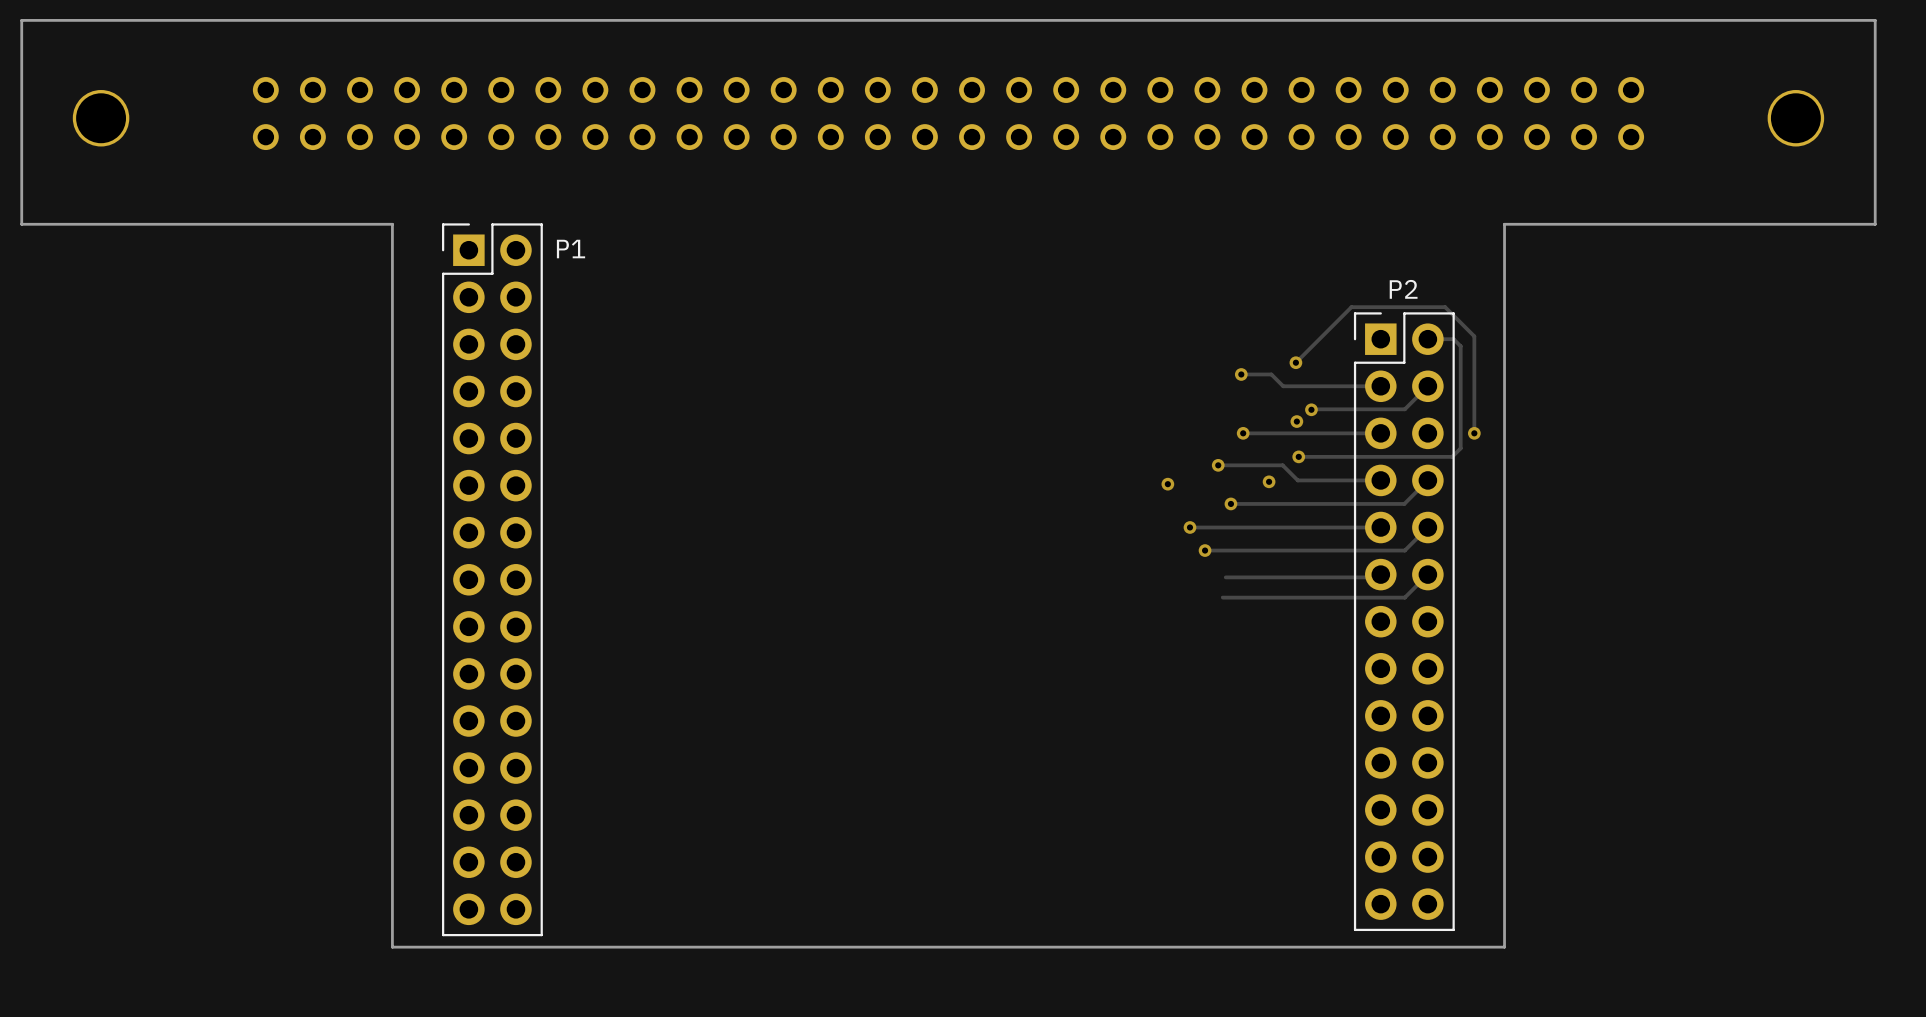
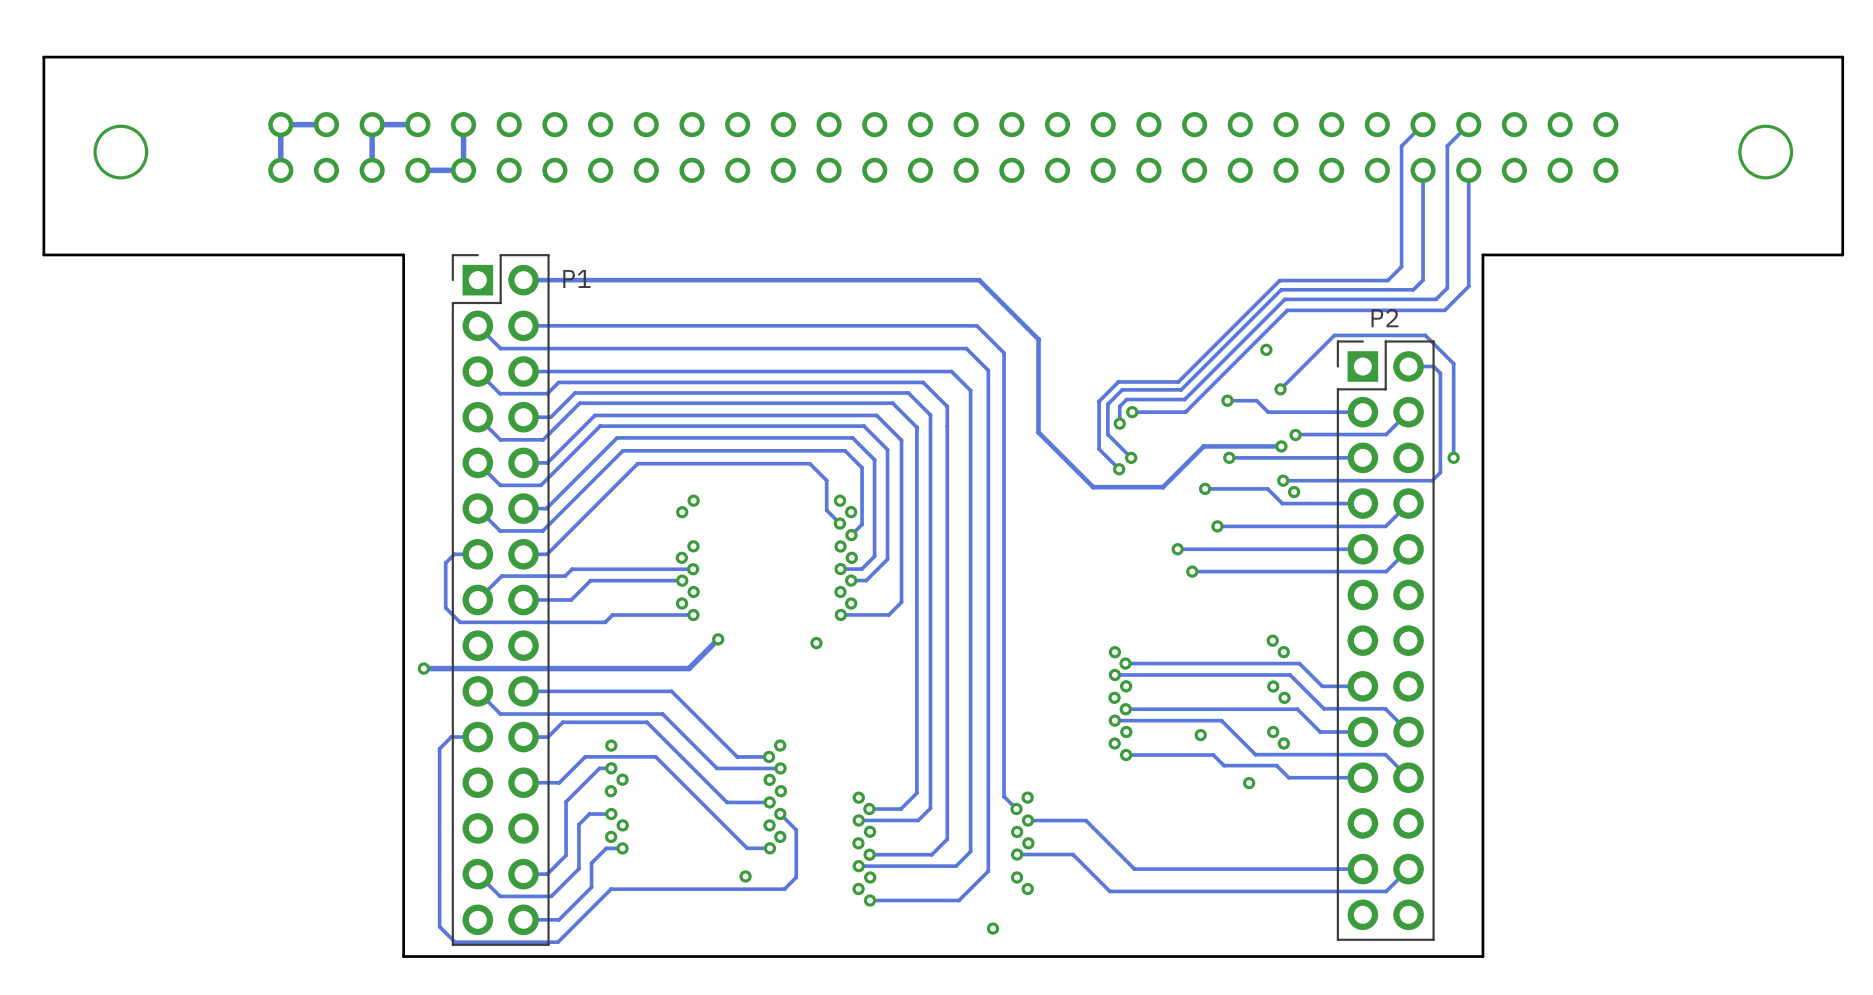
track: none -> (326, 124) (280, 124) (280, 170)
track: none -> (417, 124) (372, 124) (372, 170)
track: none -> (463, 124) (463, 170) (417, 170)
track: none -> (1423, 124) (1401, 146) (1401, 266) (1387, 280) (1279, 280) (1178, 382) (1118, 382) (1099, 401) (1099, 449) (1119, 469)
track: none -> (1468, 124) (1447, 146) (1447, 288) (1436, 299) (1284, 299) (1184, 399) (1126, 399) (1119, 406) (1119, 423)
track: none -> (1423, 170) (1423, 280) (1413, 289) (1281, 289) (1181, 389) (1122, 389) (1107, 404) (1107, 434) (1131, 457)
track: none -> (1468, 170) (1468, 286) (1444, 310) (1287, 310) (1185, 412) (1132, 412)
track: none -> (523, 280) (979, 280) (1038, 339) (1038, 432) (1093, 487) (1162, 487) (1203, 446) (1281, 446)
track: none -> (477, 325) (500, 348) (966, 348) (988, 370) (988, 871) (959, 900) (870, 900)
track: none -> (523, 325) (976, 325) (1004, 353) (1004, 796) (1017, 809)
via: none -> (1266, 349)
track: none -> (477, 371) (500, 393) (547, 393) (558, 382) (923, 382) (947, 406) (947, 839) (931, 854) (869, 854)
track: none -> (523, 371) (951, 371) (970, 390) (970, 851) (956, 866) (858, 866)
via: none -> (1132, 412)
track: none -> (477, 417) (500, 439) (543, 439) (579, 403) (892, 403) (916, 427) (916, 793) (900, 809) (869, 809)
track: none -> (523, 417) (550, 417) (575, 392) (908, 392) (930, 415) (930, 808) (918, 820) (858, 820)
via: none -> (1119, 423)
via: none -> (1131, 457)
track: none -> (477, 462) (500, 485) (540, 485) (600, 426) (863, 426) (887, 449) (887, 559) (866, 580) (851, 580)
track: none -> (523, 462) (547, 462) (594, 415) (876, 415) (901, 440) (901, 602) (888, 614) (840, 614)
via: none -> (1119, 469)
via: none -> (693, 500)
via: none -> (840, 500)
via position: (1269, 481) -> (1294, 492)
via: (1167, 484) -> none
track: none -> (477, 508) (500, 530) (542, 530) (622, 450) (845, 450) (862, 467) (862, 524) (851, 535)
track: none -> (523, 508) (546, 508) (617, 437) (852, 437) (874, 459) (874, 556) (861, 569) (840, 569)
via: none -> (682, 512)
via: none -> (851, 512)
via: none -> (839, 523)
track: none -> (840, 524) (826, 510) (826, 480) (809, 463) (637, 463) (547, 554) (523, 554)
via: none -> (851, 535)
via: none -> (693, 546)
via: none -> (840, 546)
track: none -> (477, 554) (454, 554) (445, 562) (445, 607) (460, 622) (605, 622) (612, 615) (693, 615)
via: none -> (681, 557)
via: none -> (851, 557)
via: none -> (840, 569)
track: none -> (693, 569) (572, 569) (565, 576) (501, 576) (477, 599)
via: none -> (693, 569)
track: none -> (682, 580) (590, 580) (571, 599) (523, 599)
via: none -> (682, 580)
via: none -> (851, 580)
via: none -> (693, 591)
via: none -> (840, 591)
track: (1427, 574) (1404, 597) (1222, 597) -> none
track: (1378, 577) (1225, 577) -> none
via: none -> (682, 603)
via: none -> (851, 603)
via: none -> (693, 615)
via: none -> (840, 614)
track: none -> (718, 639) (688, 668) (423, 668)
via: none -> (718, 639)
via: none -> (1272, 640)
via: none -> (816, 643)
via: none -> (1114, 652)
via: none -> (1283, 652)
track: none -> (1125, 663) (1299, 663) (1322, 686) (1362, 686)
via: none -> (1125, 663)
via: none -> (423, 668)
track: none -> (1114, 674) (1290, 674) (1323, 708) (1385, 708) (1408, 732)
via: none -> (1114, 674)
via: none -> (1126, 686)
via: none -> (1273, 686)
track: none -> (477, 691) (500, 713) (662, 713) (717, 768) (780, 768)
track: none -> (523, 691) (671, 691) (737, 756) (769, 757)
via: none -> (1114, 697)
via: none -> (1284, 697)
track: none -> (1125, 709) (1297, 709) (1320, 732) (1362, 732)
via: none -> (1125, 709)
track: none -> (1114, 720) (1221, 720) (1255, 754) (1385, 754) (1408, 777)
via: none -> (1114, 720)
via: none -> (1126, 731)
via: none -> (1273, 731)
via: none -> (1200, 735)
track: none -> (477, 737) (451, 737) (439, 748) (439, 926) (455, 942) (558, 942) (611, 889) (784, 889) (796, 877) (796, 829) (780, 813)
track: none -> (523, 737) (548, 737) (562, 722) (646, 722) (727, 802) (769, 802)
via: none -> (1114, 743)
via: none -> (1283, 743)
via: none -> (611, 745)
via: none -> (780, 745)
track: none -> (1126, 755) (1213, 755) (1224, 765) (1276, 765) (1288, 777) (1362, 777)
via: none -> (1126, 755)
via: none -> (769, 756)
track: none -> (611, 768) (599, 768) (566, 801) (566, 855) (547, 874) (523, 874)
via: none -> (611, 768)
via: none -> (780, 768)
via: none -> (622, 779)
via: none -> (769, 779)
track: none -> (523, 782) (559, 782) (585, 756) (655, 756) (747, 848) (769, 848)
via: none -> (1249, 783)
via: none -> (610, 791)
via: none -> (780, 791)
via: none -> (858, 797)
via: none -> (1027, 797)
via: none -> (769, 802)
via: none -> (869, 809)
via: none -> (1016, 809)
track: none -> (611, 814) (589, 814) (578, 824) (578, 868) (551, 896) (500, 896) (477, 874)
via: none -> (611, 814)
via: none -> (780, 813)
via: none -> (858, 820)
track: none -> (1028, 820) (1085, 820) (1134, 869) (1362, 869)
via: none -> (1028, 820)
via: none -> (622, 825)
via: none -> (769, 825)
via: none -> (870, 831)
via: none -> (1017, 831)
via: none -> (611, 836)
via: none -> (780, 836)
via: none -> (858, 843)
via: none -> (1028, 843)
track: none -> (622, 848) (606, 848) (591, 863) (591, 887) (558, 919) (523, 919)
via: none -> (622, 848)
via: none -> (769, 848)
via: none -> (869, 854)
track: none -> (1017, 854) (1072, 854) (1109, 891) (1386, 891) (1408, 869)
via: none -> (1017, 854)
via: none -> (858, 866)
via: none -> (745, 876)
via: none -> (870, 877)
via: none -> (1017, 877)
via: none -> (858, 888)
via: none -> (1027, 888)
via: none -> (870, 900)
via: none -> (993, 928)

